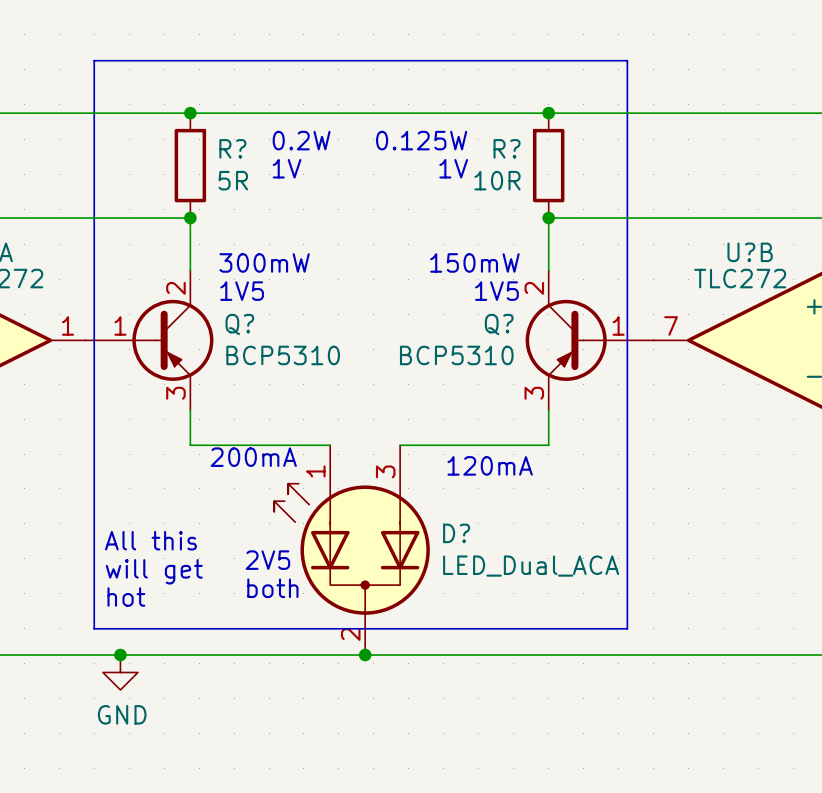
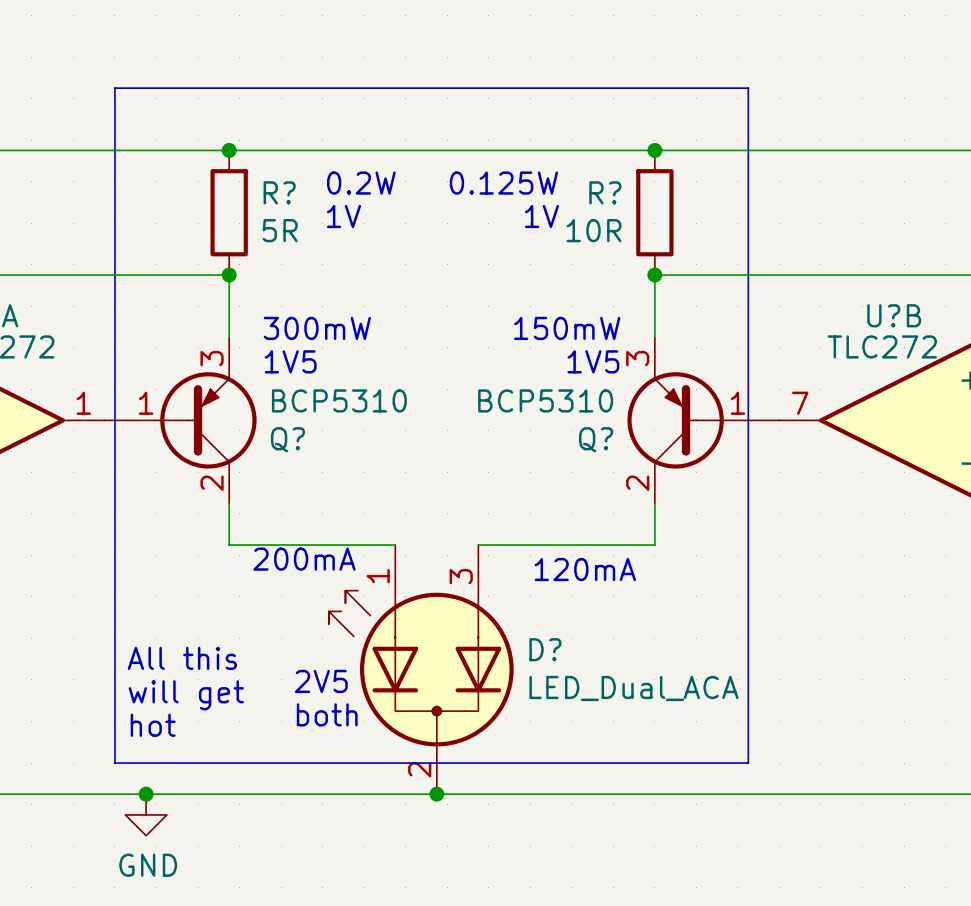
Q? flip: as is (172, 340) -> up-down (208, 420)
Q? flip: as is (566, 340) -> up-down (675, 420)

